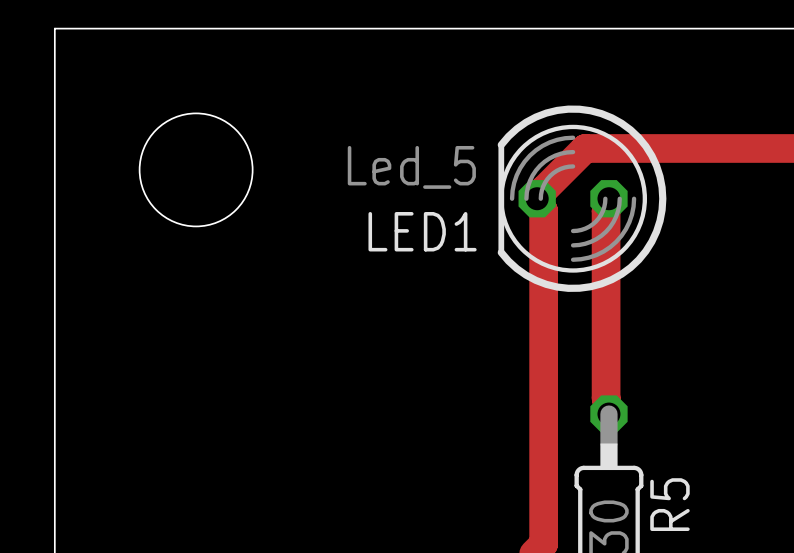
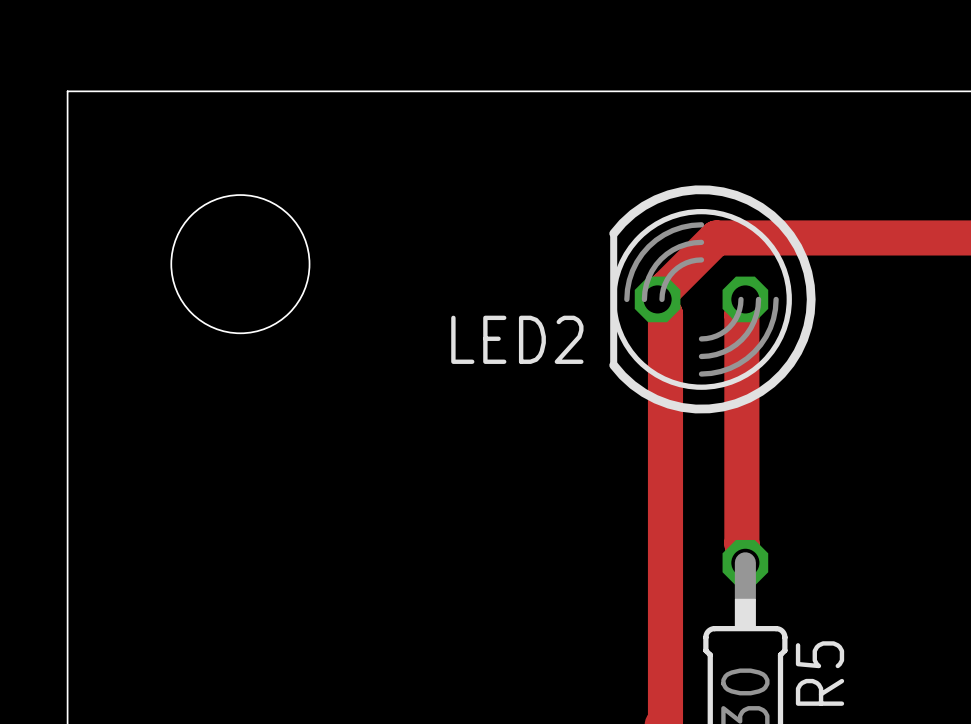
LED1 value: Led_5 (411, 167) -> none
LED1 name: LED1 (422, 231) -> LED2 (517, 339)

